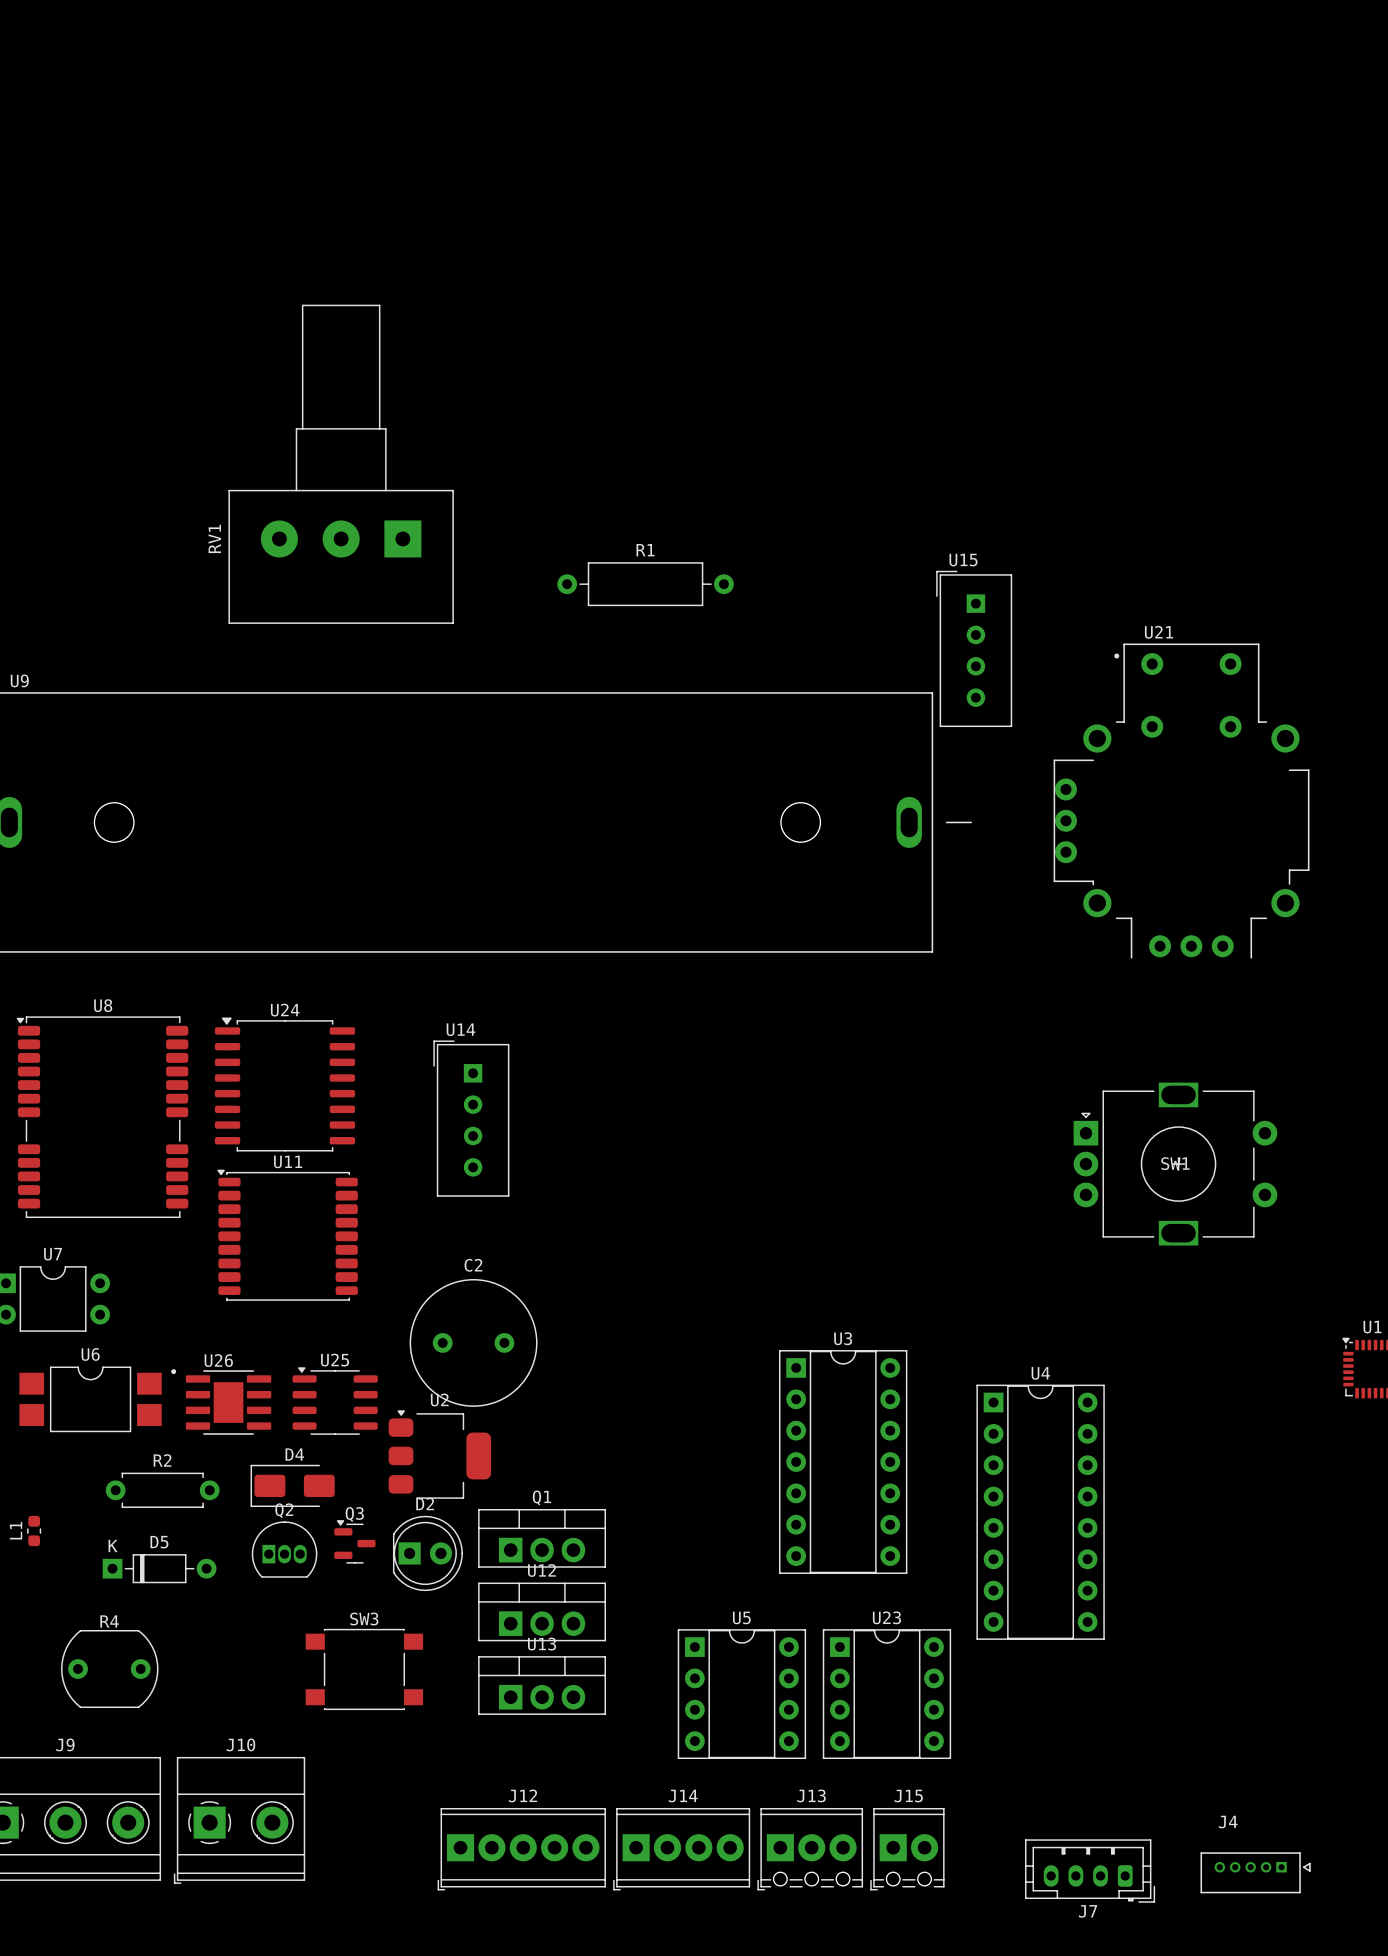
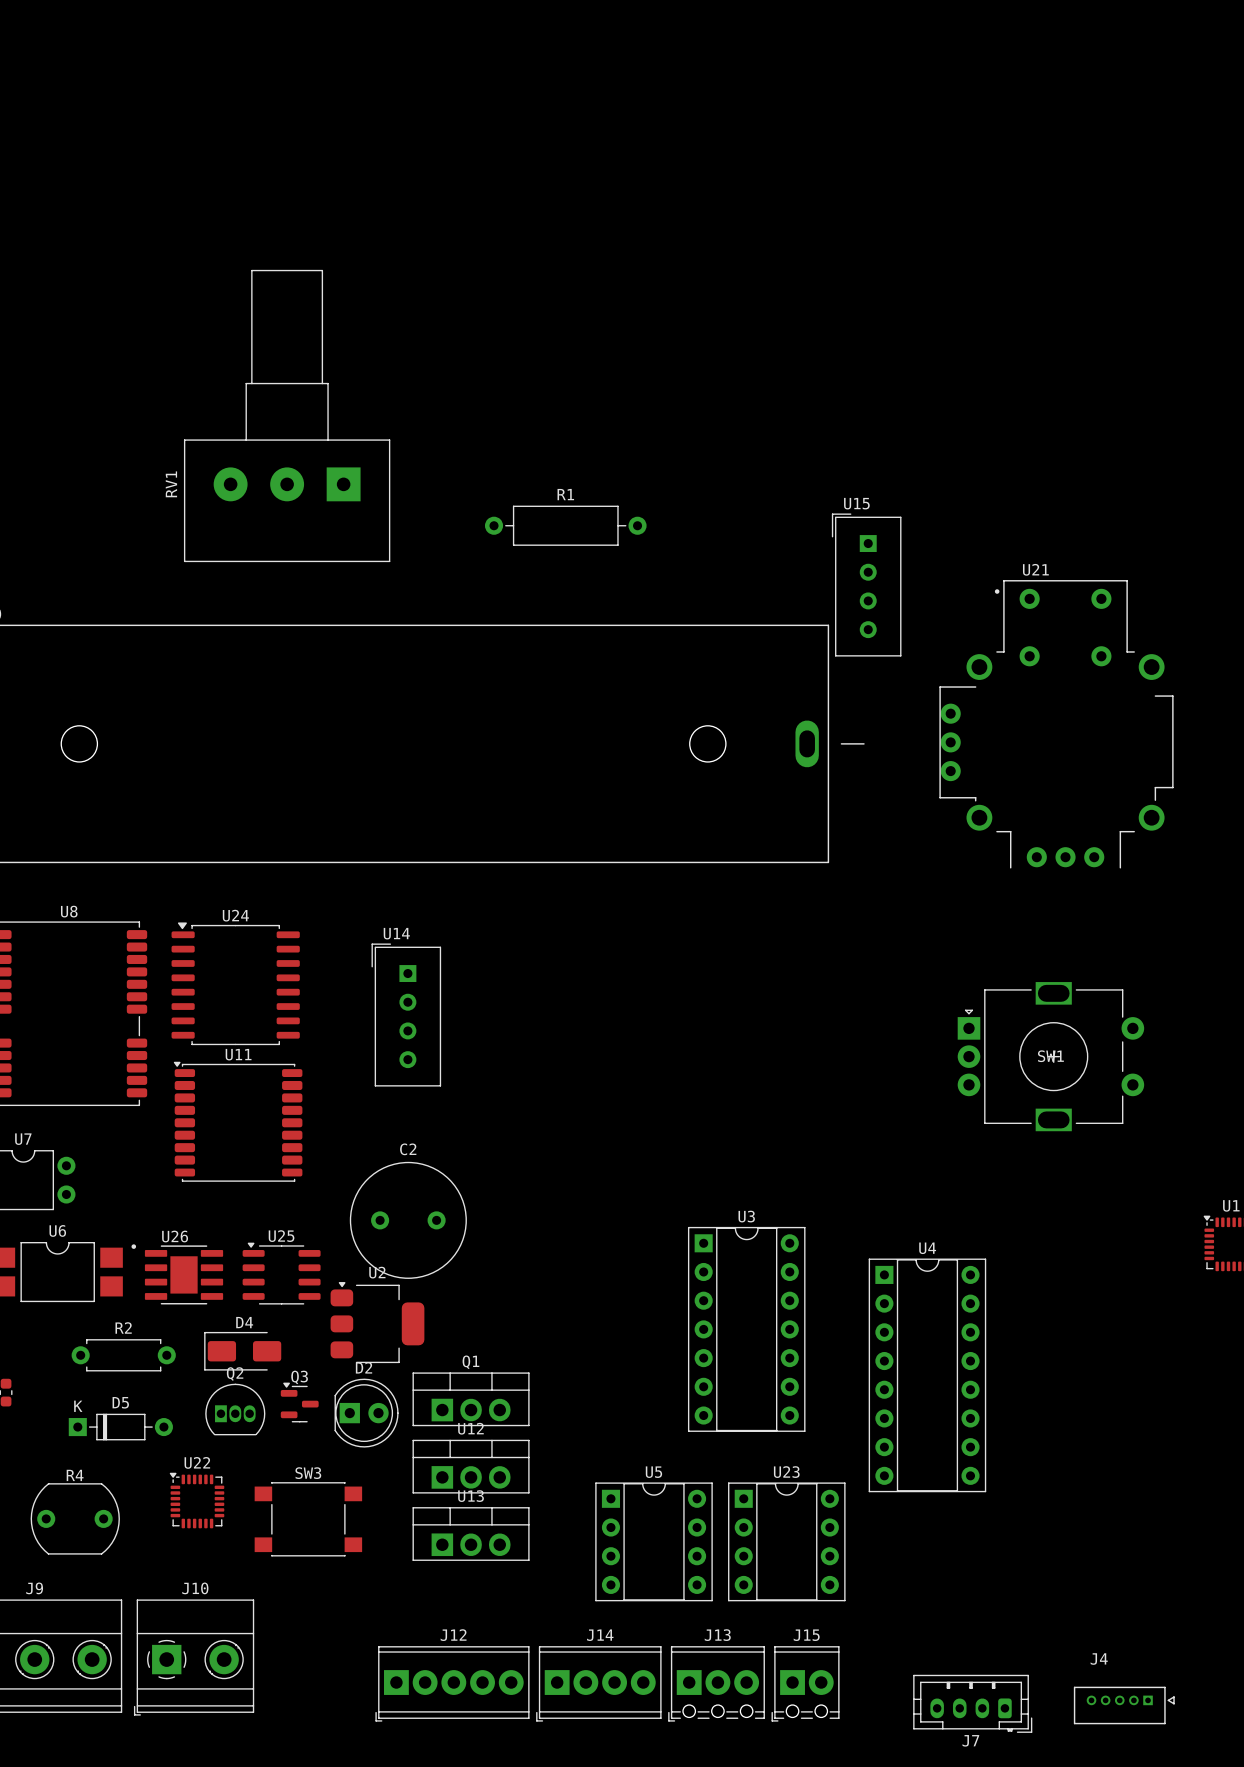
U22: none -> (197, 1500)

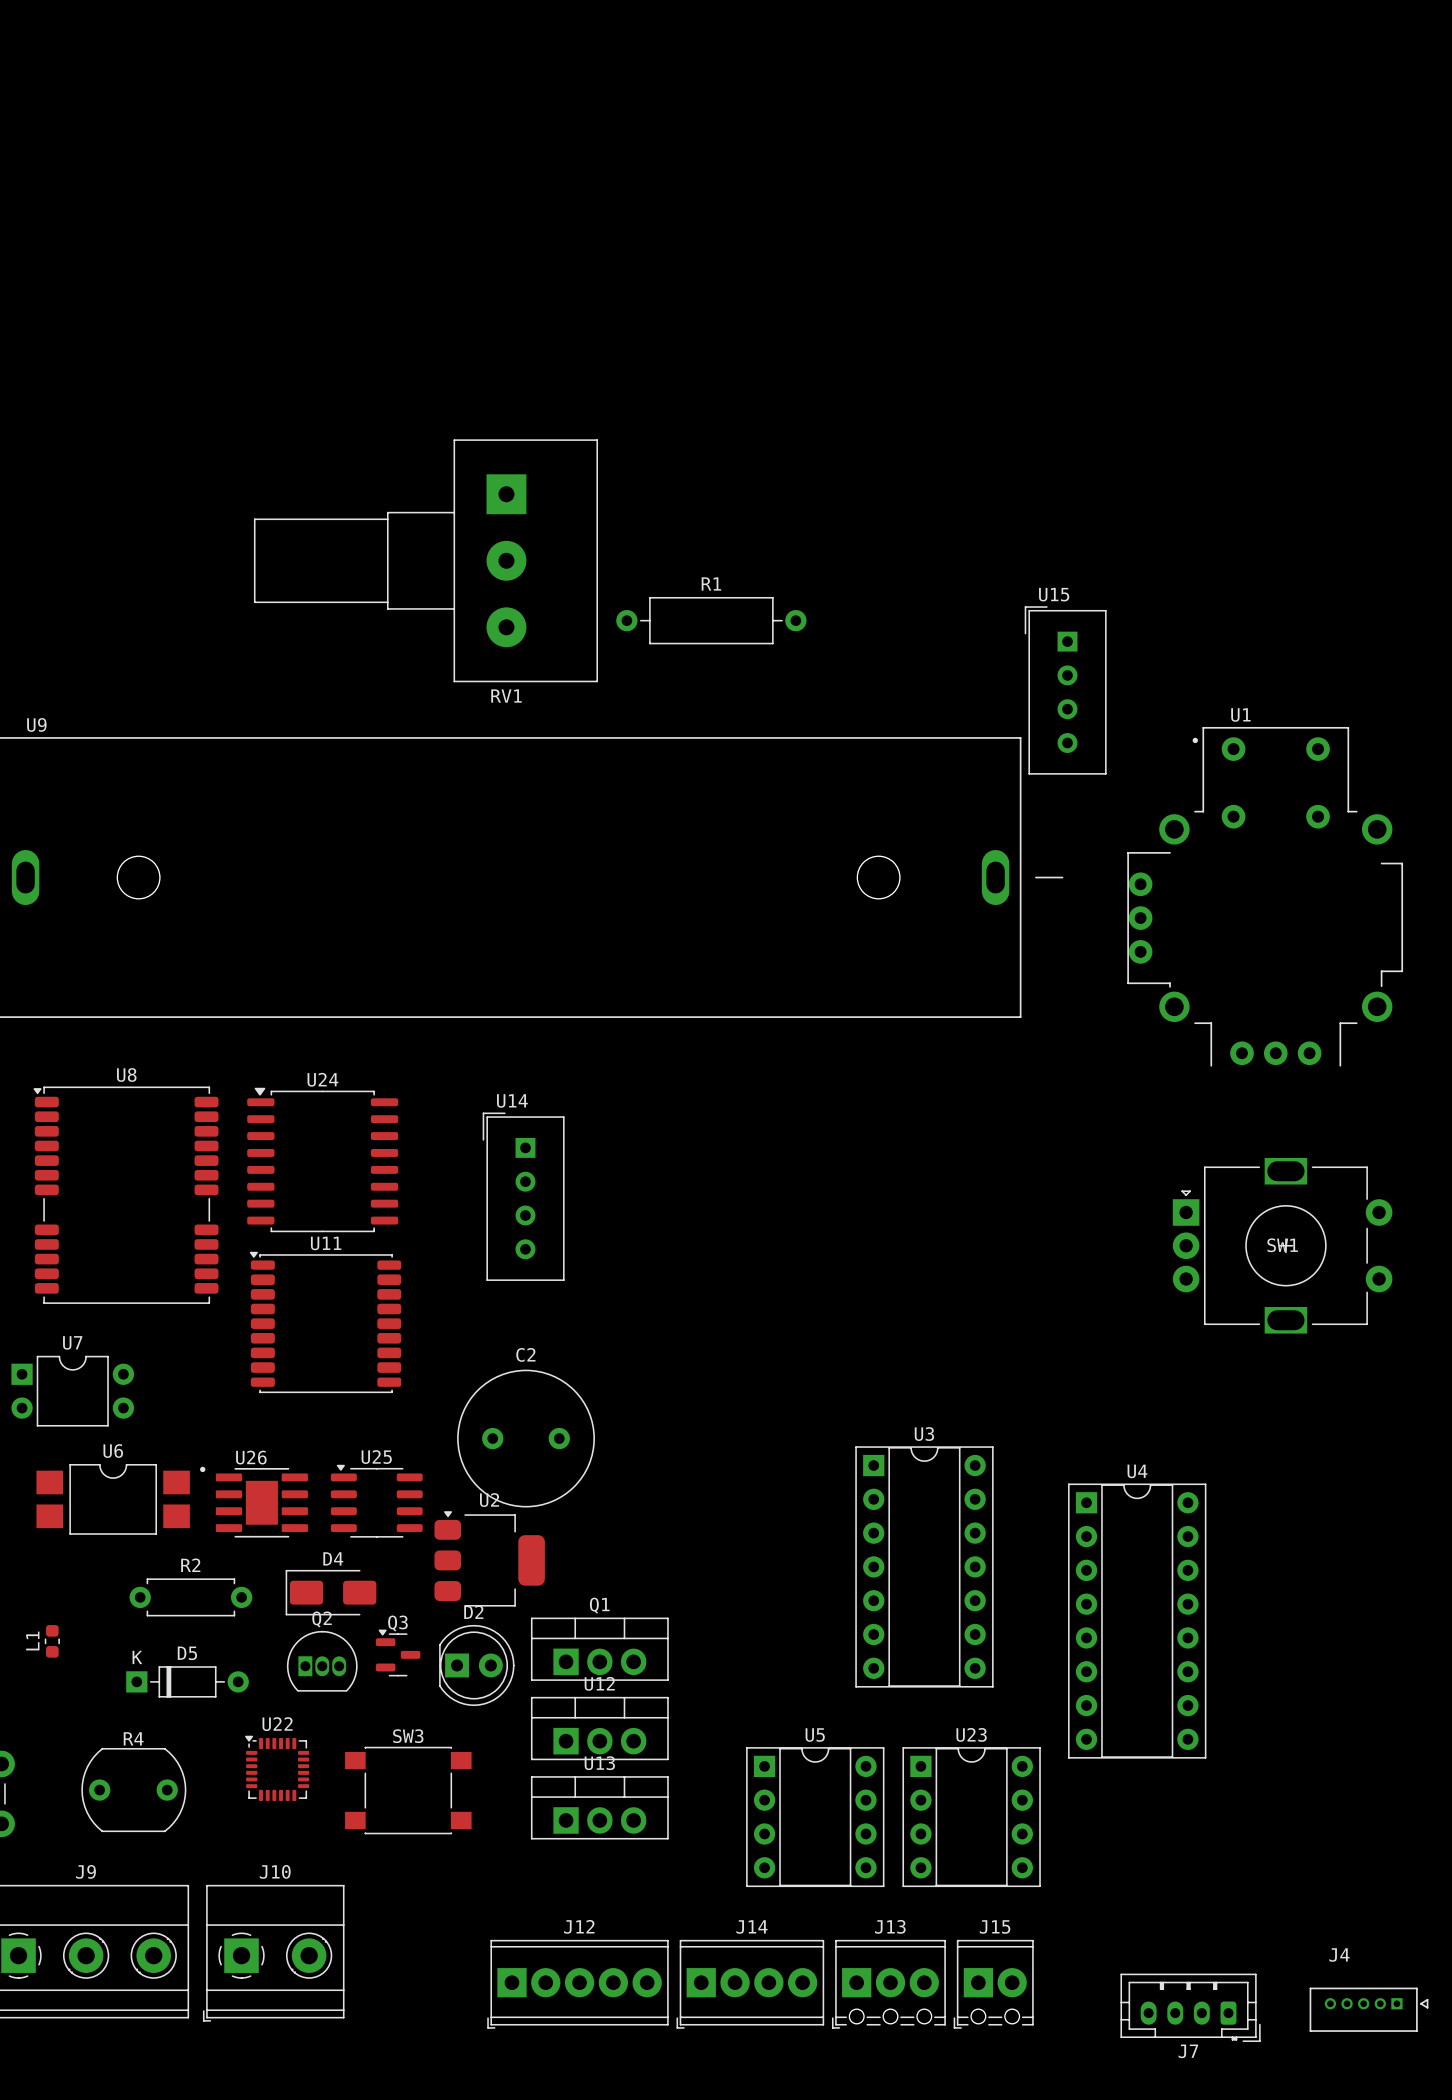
RV1 rotation: 0° (287, 415) -> 90° counterclockwise (425, 560)
U21: (1056, 724) -> none
U1: none -> (1265, 896)

